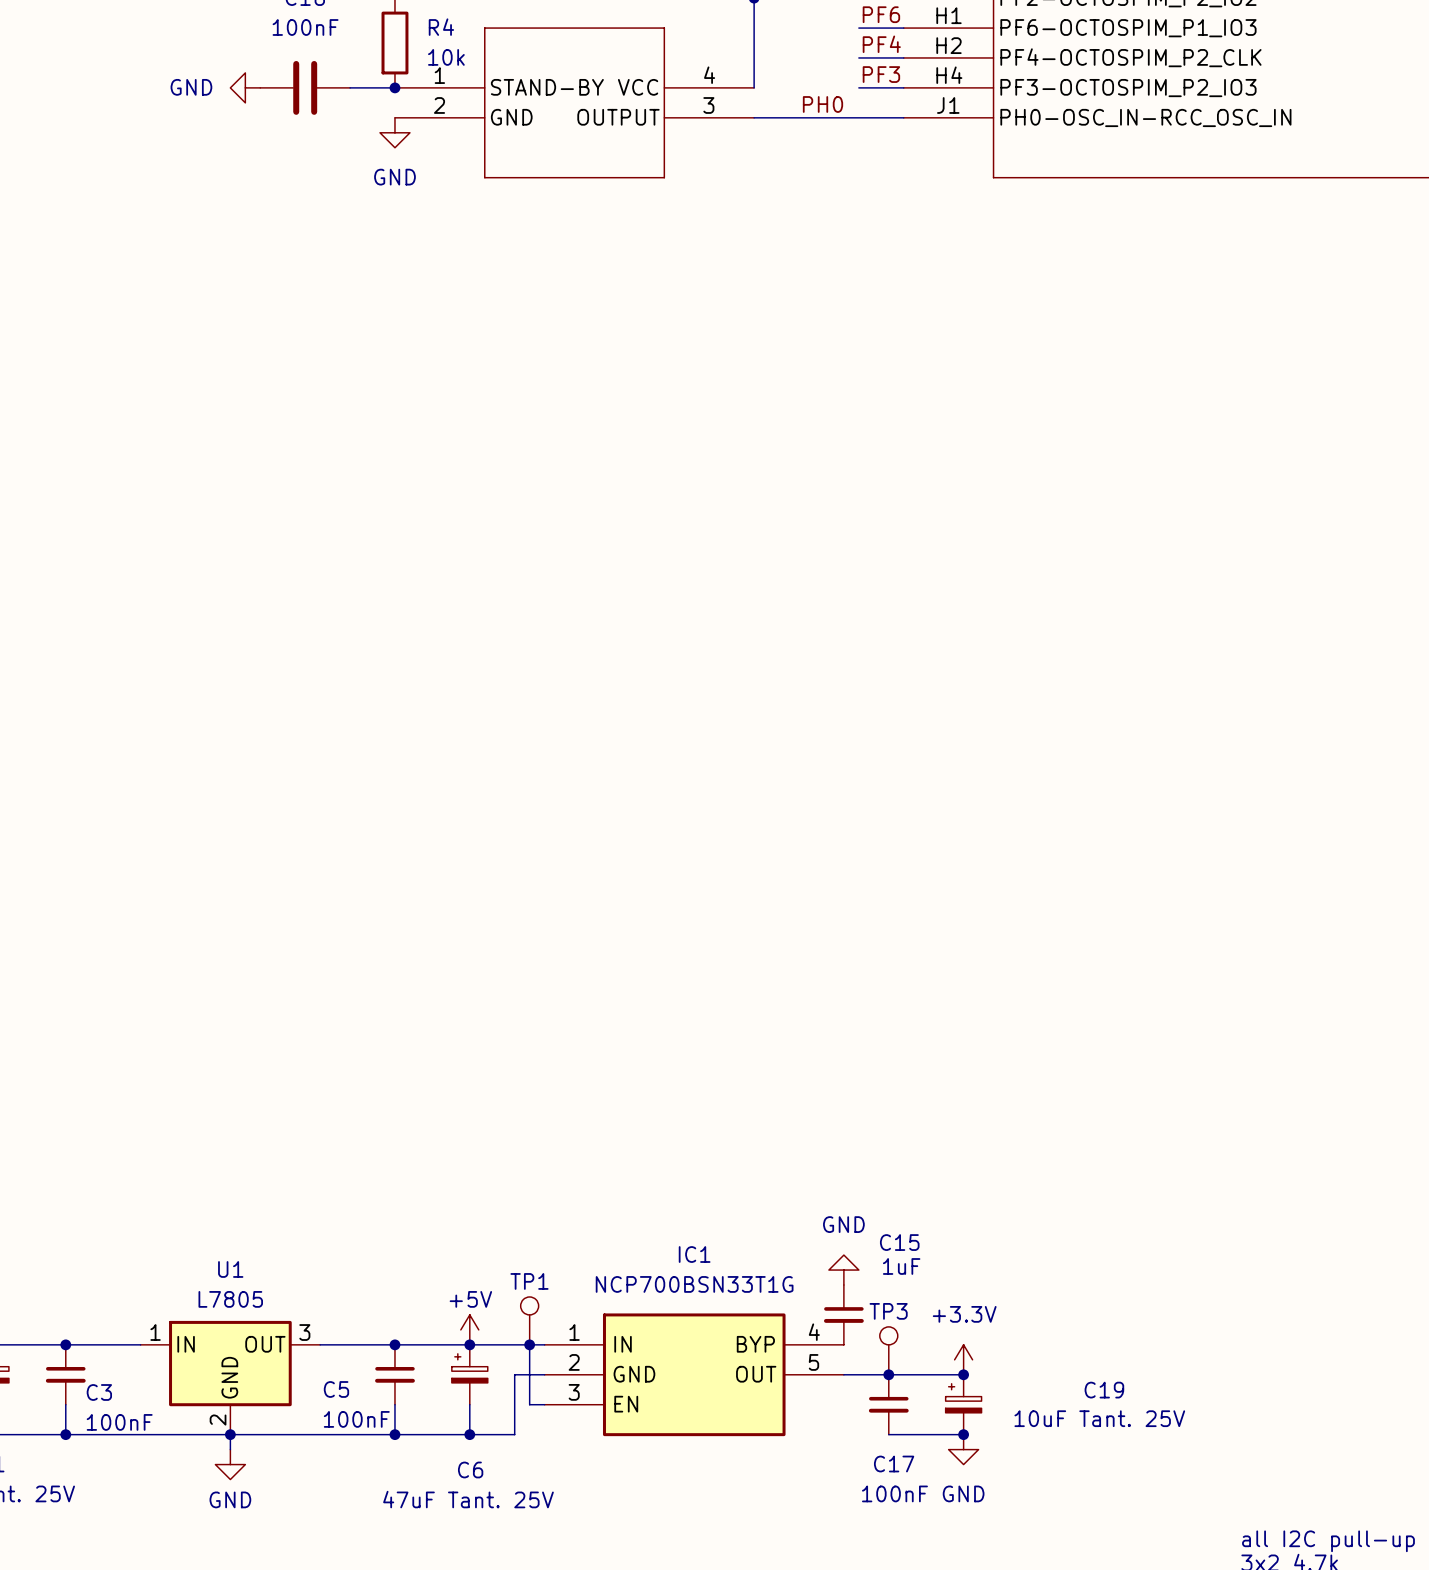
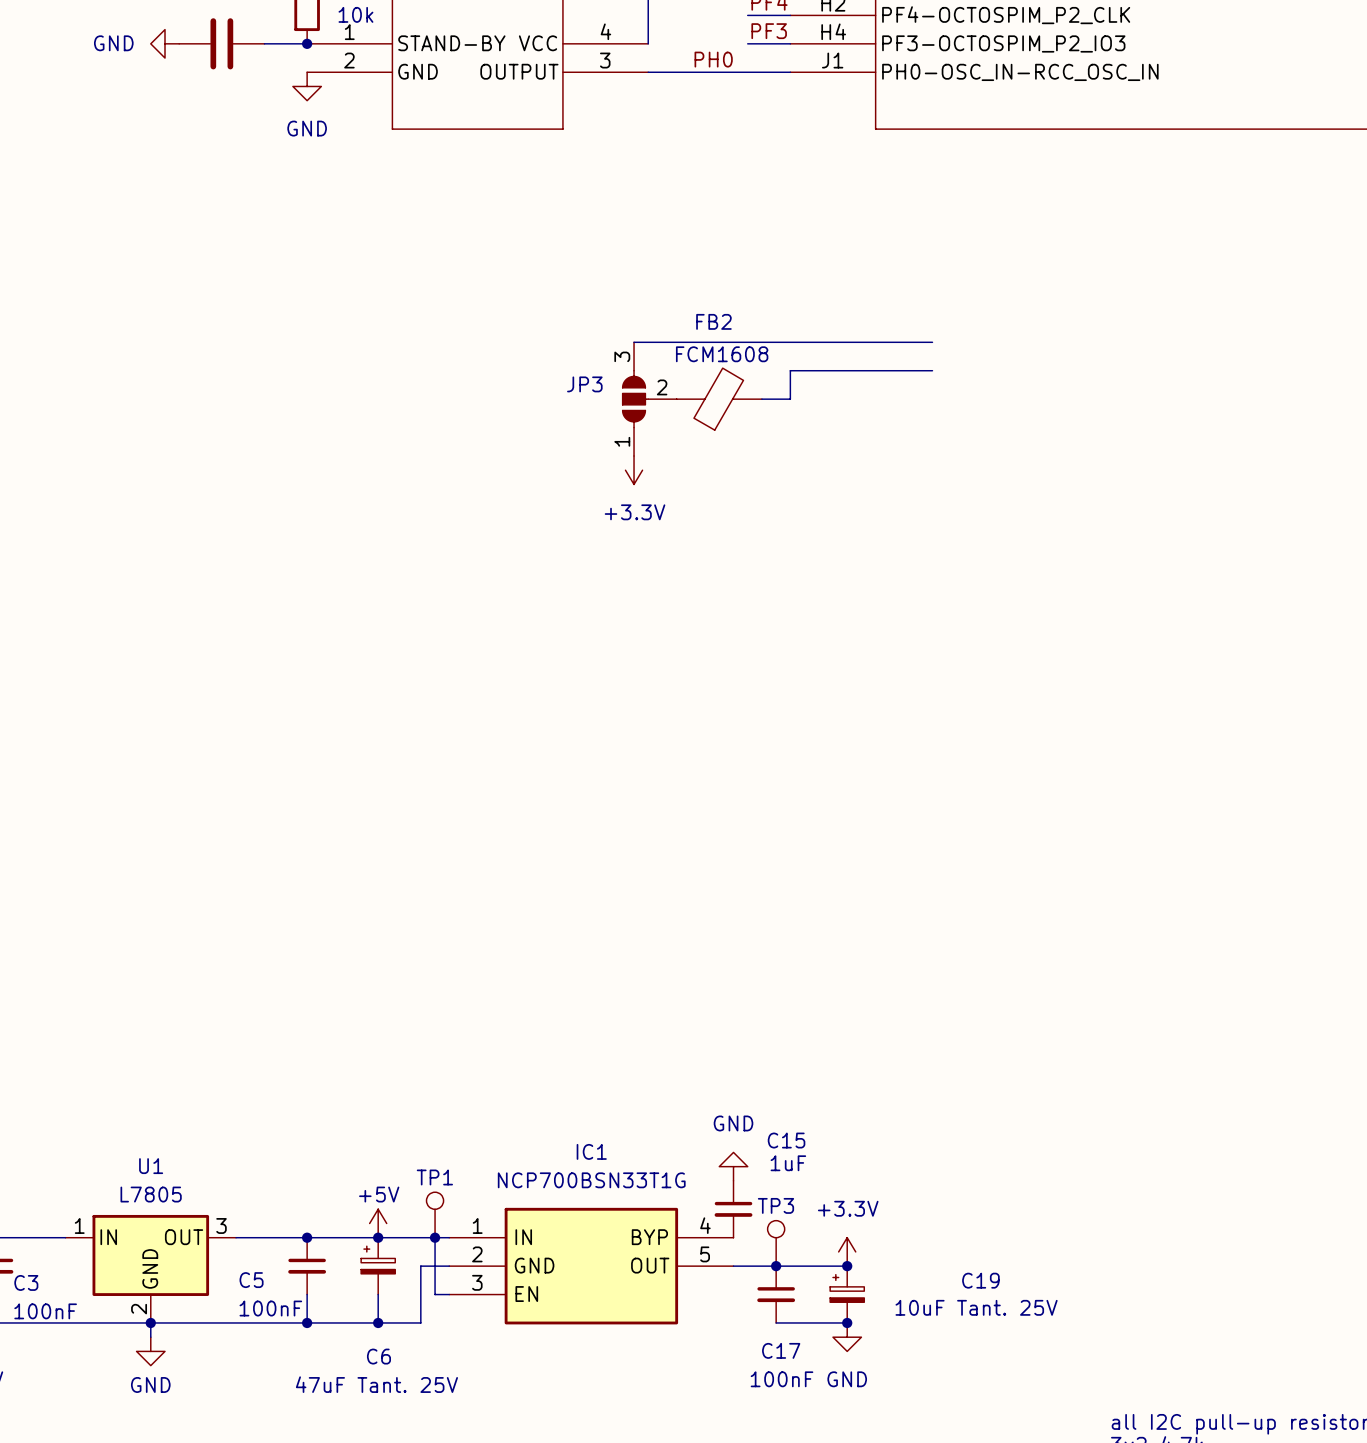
wire: none -> (634, 342) (932, 342)
wire: none -> (932, 370) (790, 370) (790, 399) (761, 399)
JP3: none -> (649, 399)
FB2: none -> FCM1608 (719, 399)
power symbol: none -> +3.3V (634, 470)

